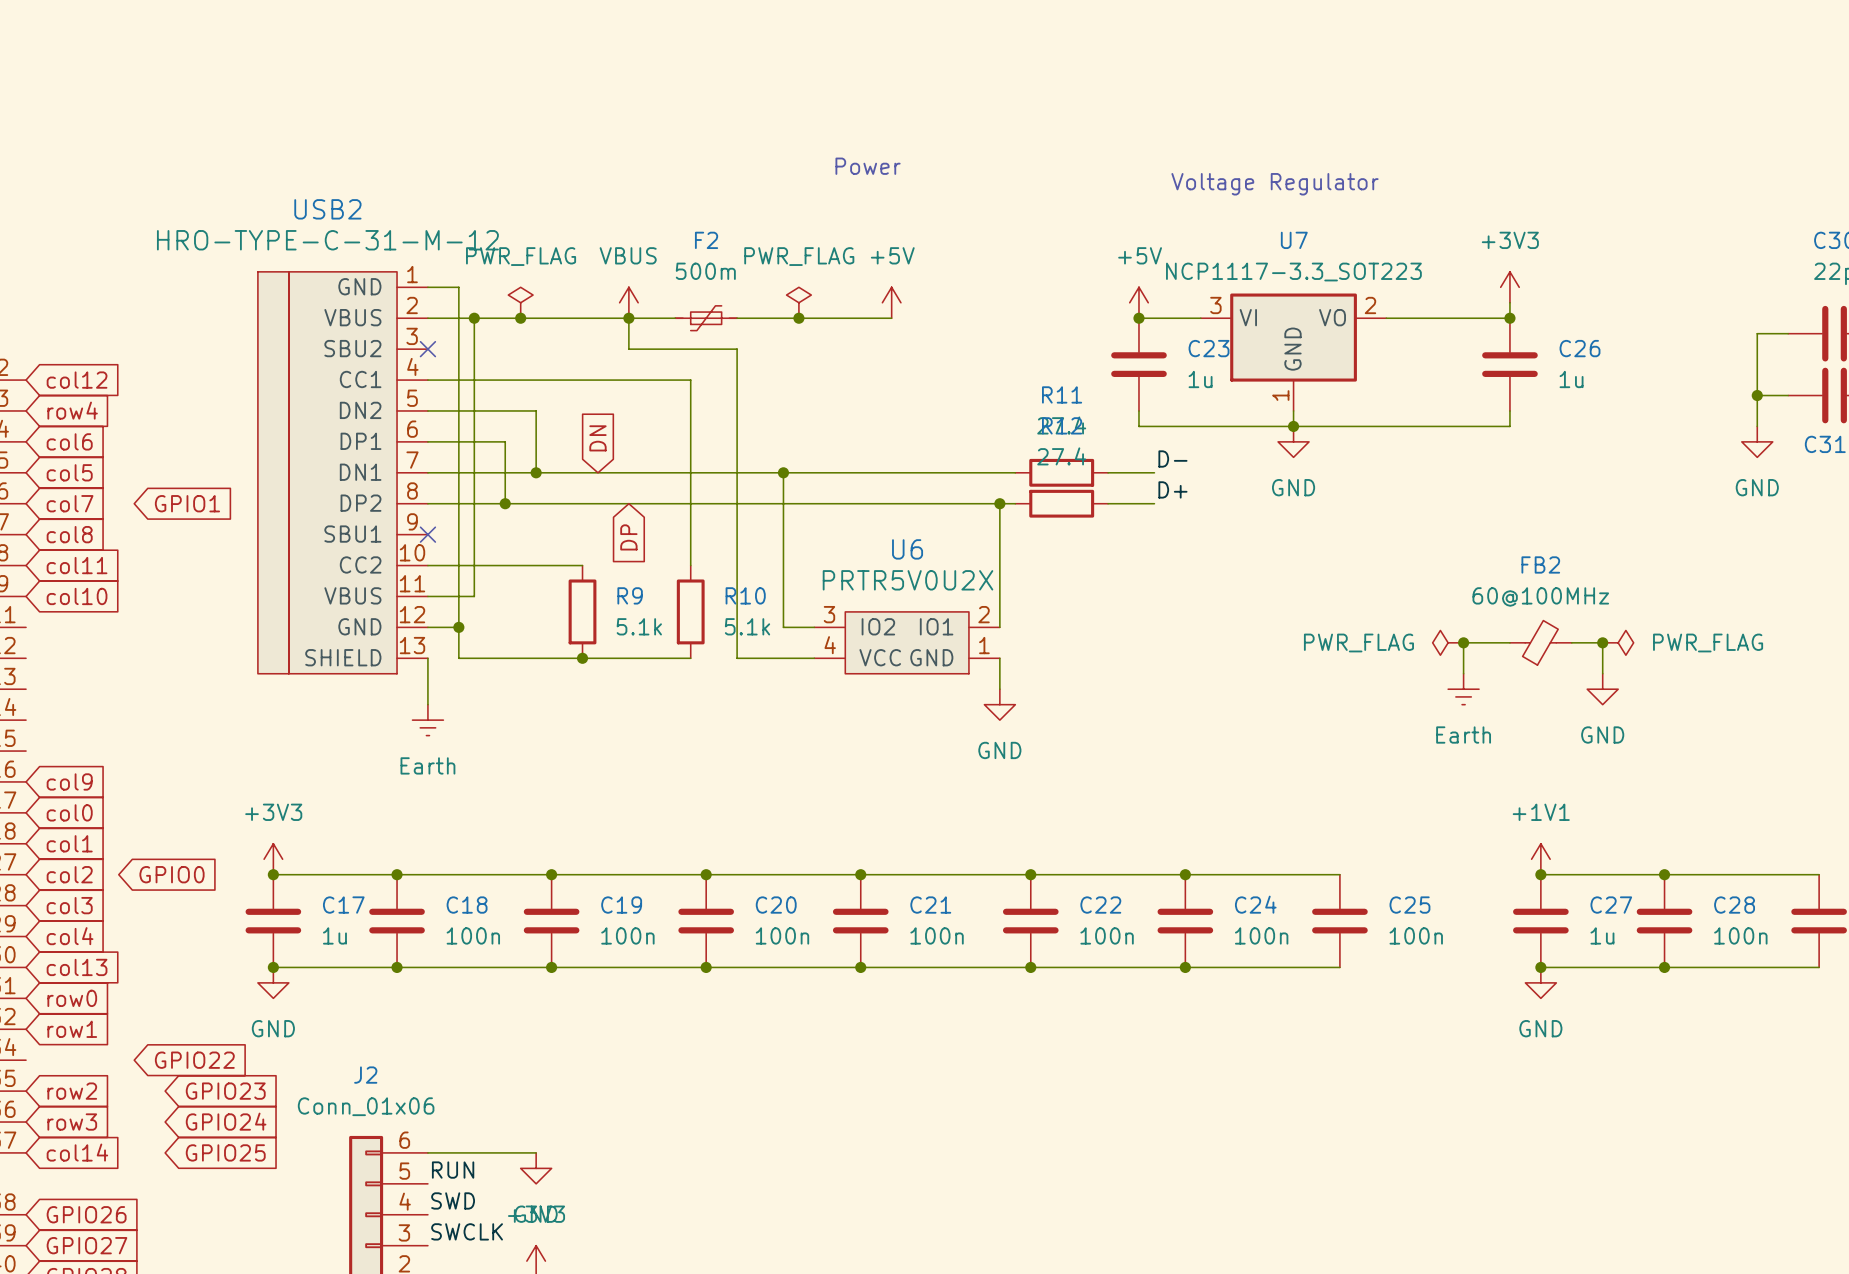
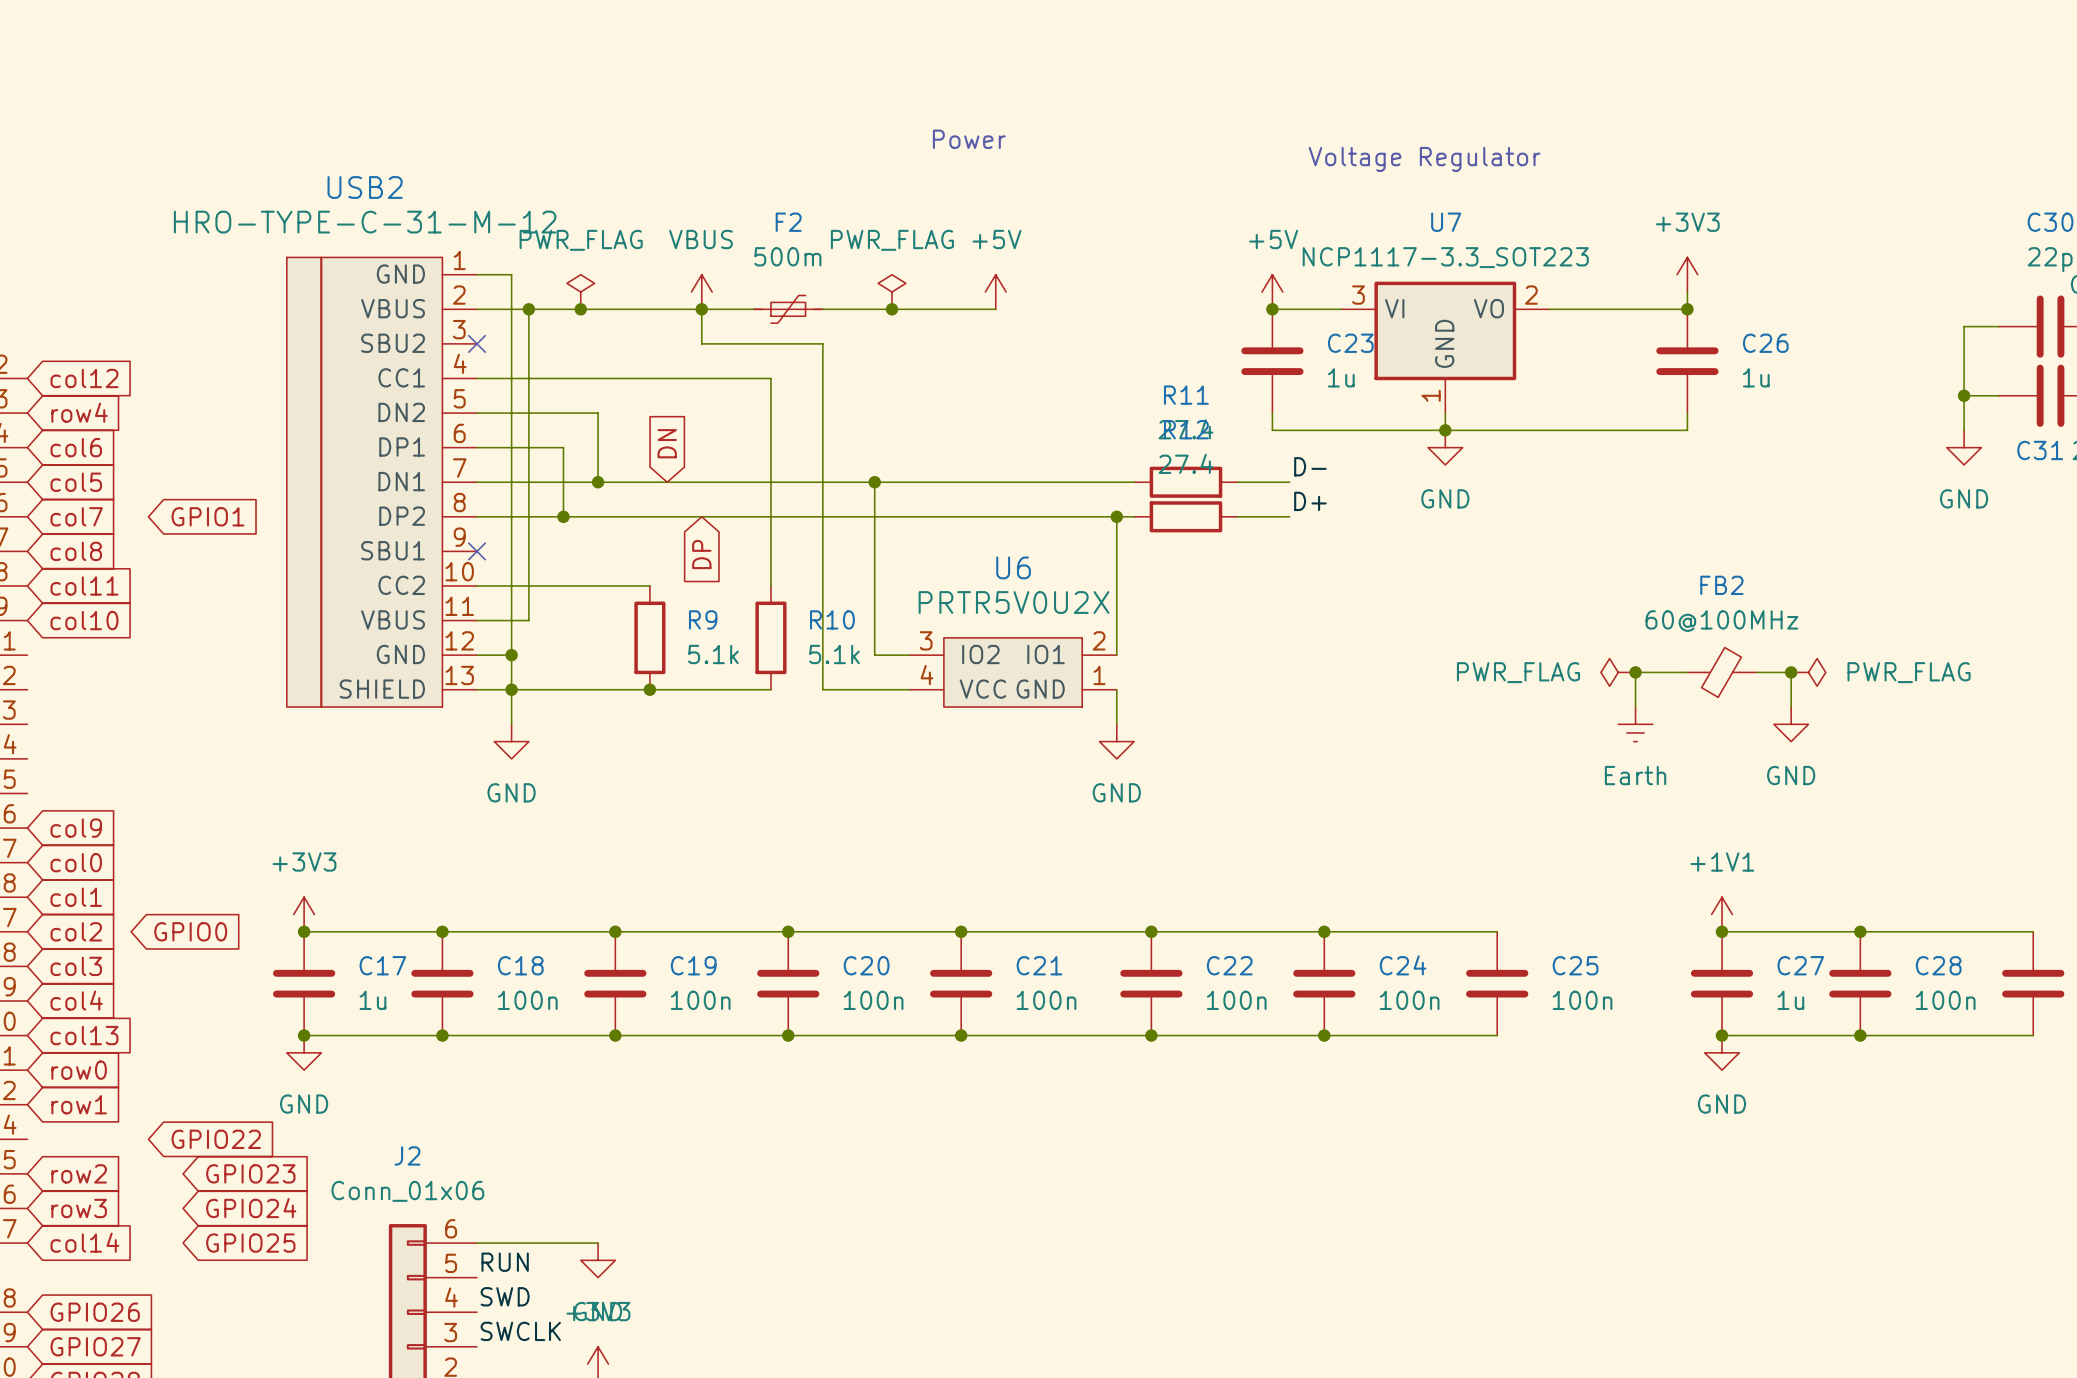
wire: (427, 658) (427, 704) -> (477, 689) (511, 689) (511, 724)
junction: none -> (511, 689)
power symbol: none -> GND (511, 741)
power symbol: Earth (427, 720) -> none

